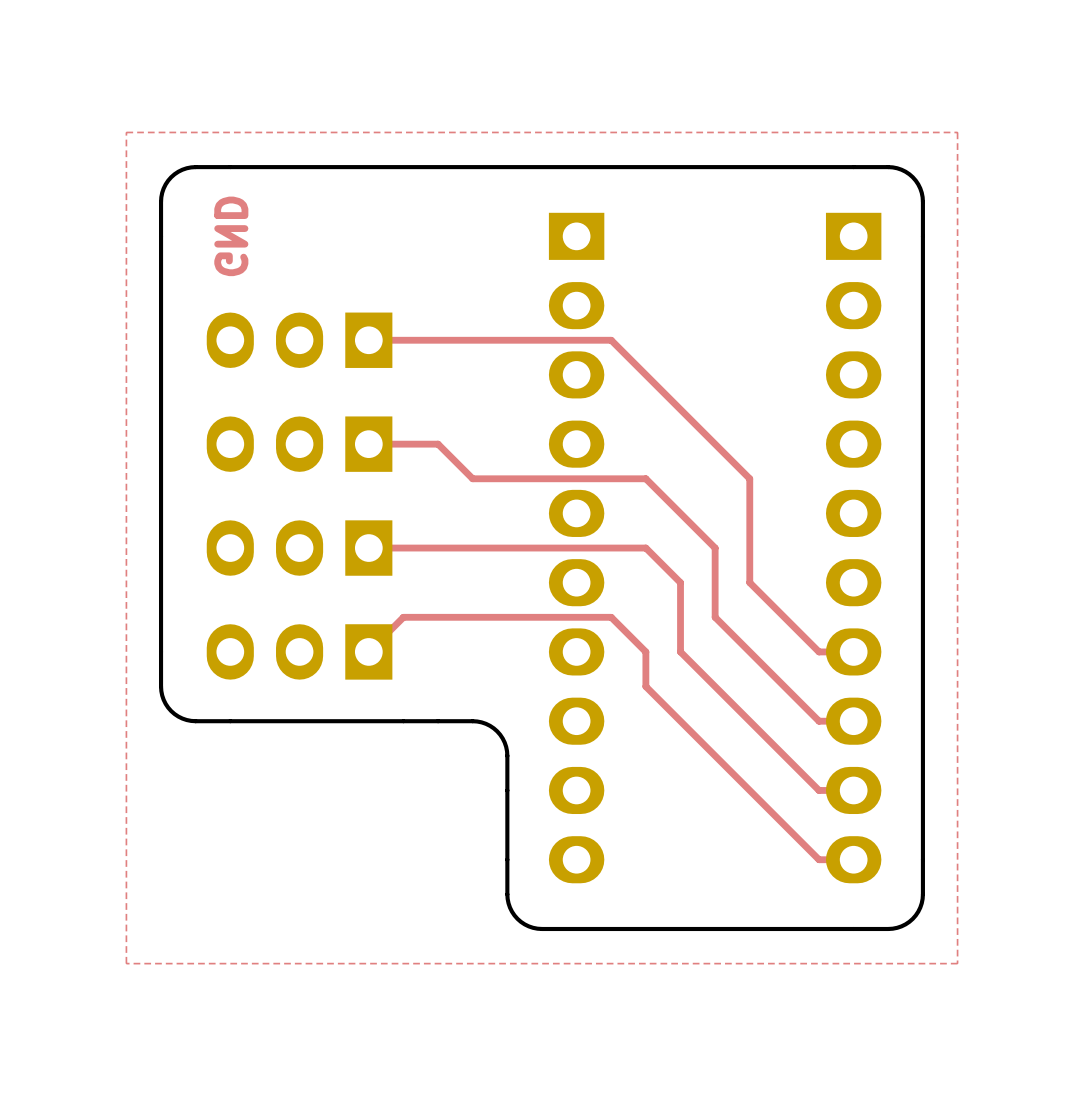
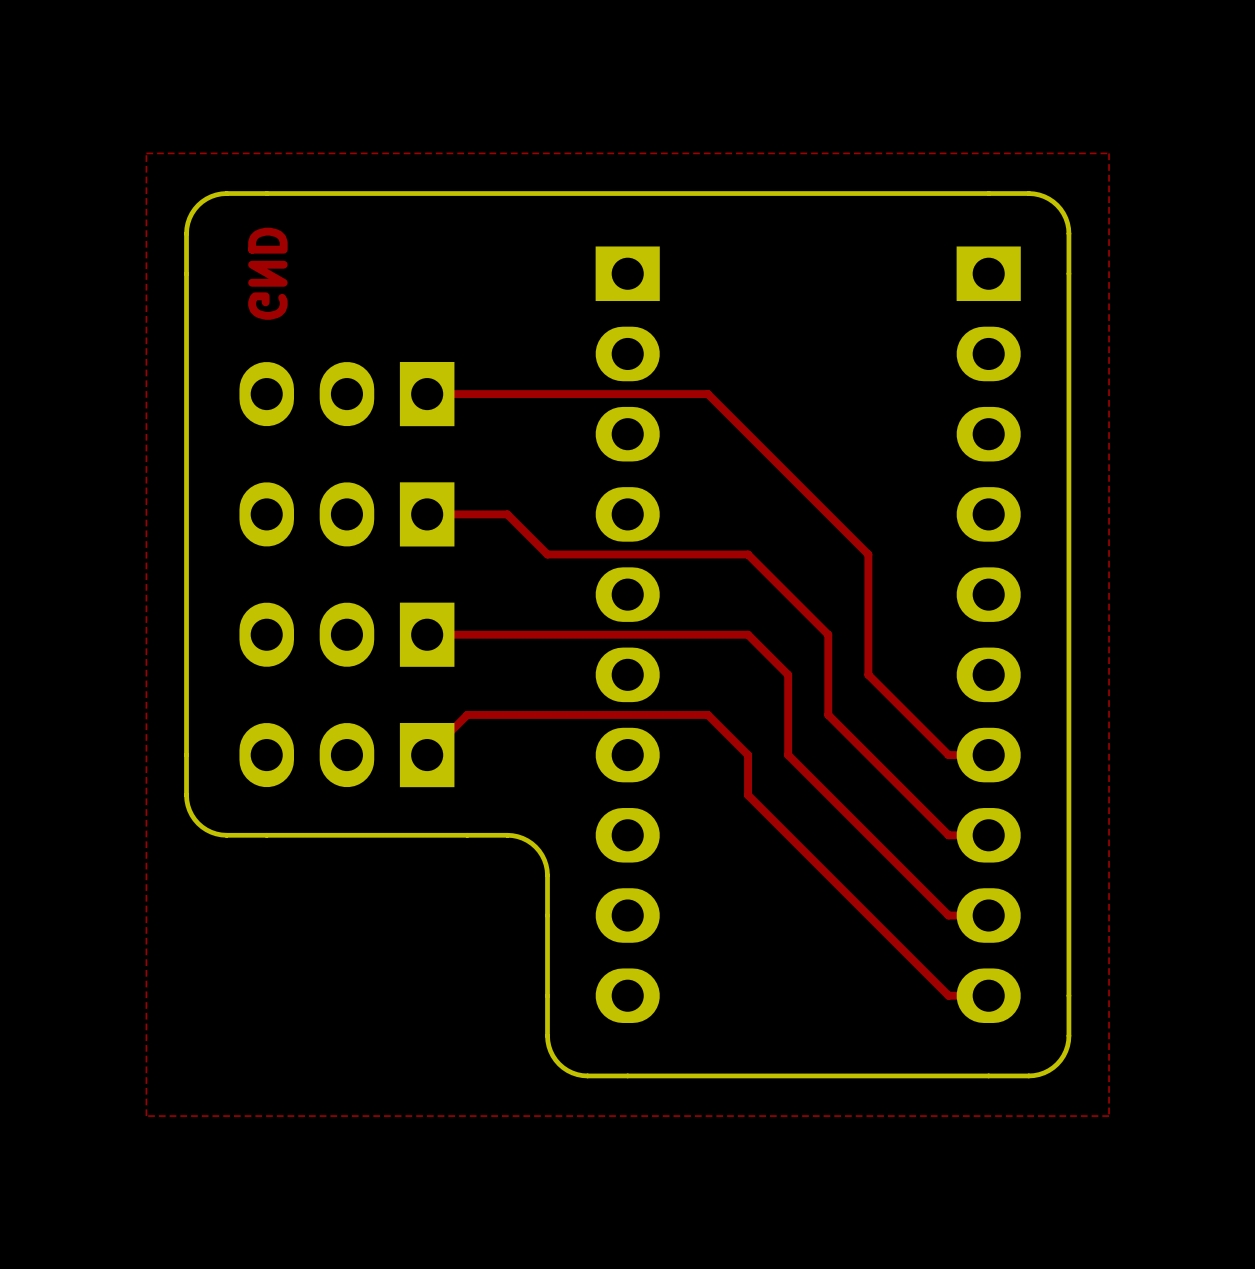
part position: (576, 548) -> (627, 634)
board edge: (438, 721) (481, 722) (493, 728) (502, 738) (507, 755) (508, 903) (514, 915) (520, 921) (528, 926) (541, 928) -> (507, 835) (517, 836) (531, 843) (542, 855) (546, 865) (547, 1035) (552, 1055) (563, 1067) (577, 1074) (627, 1075)

